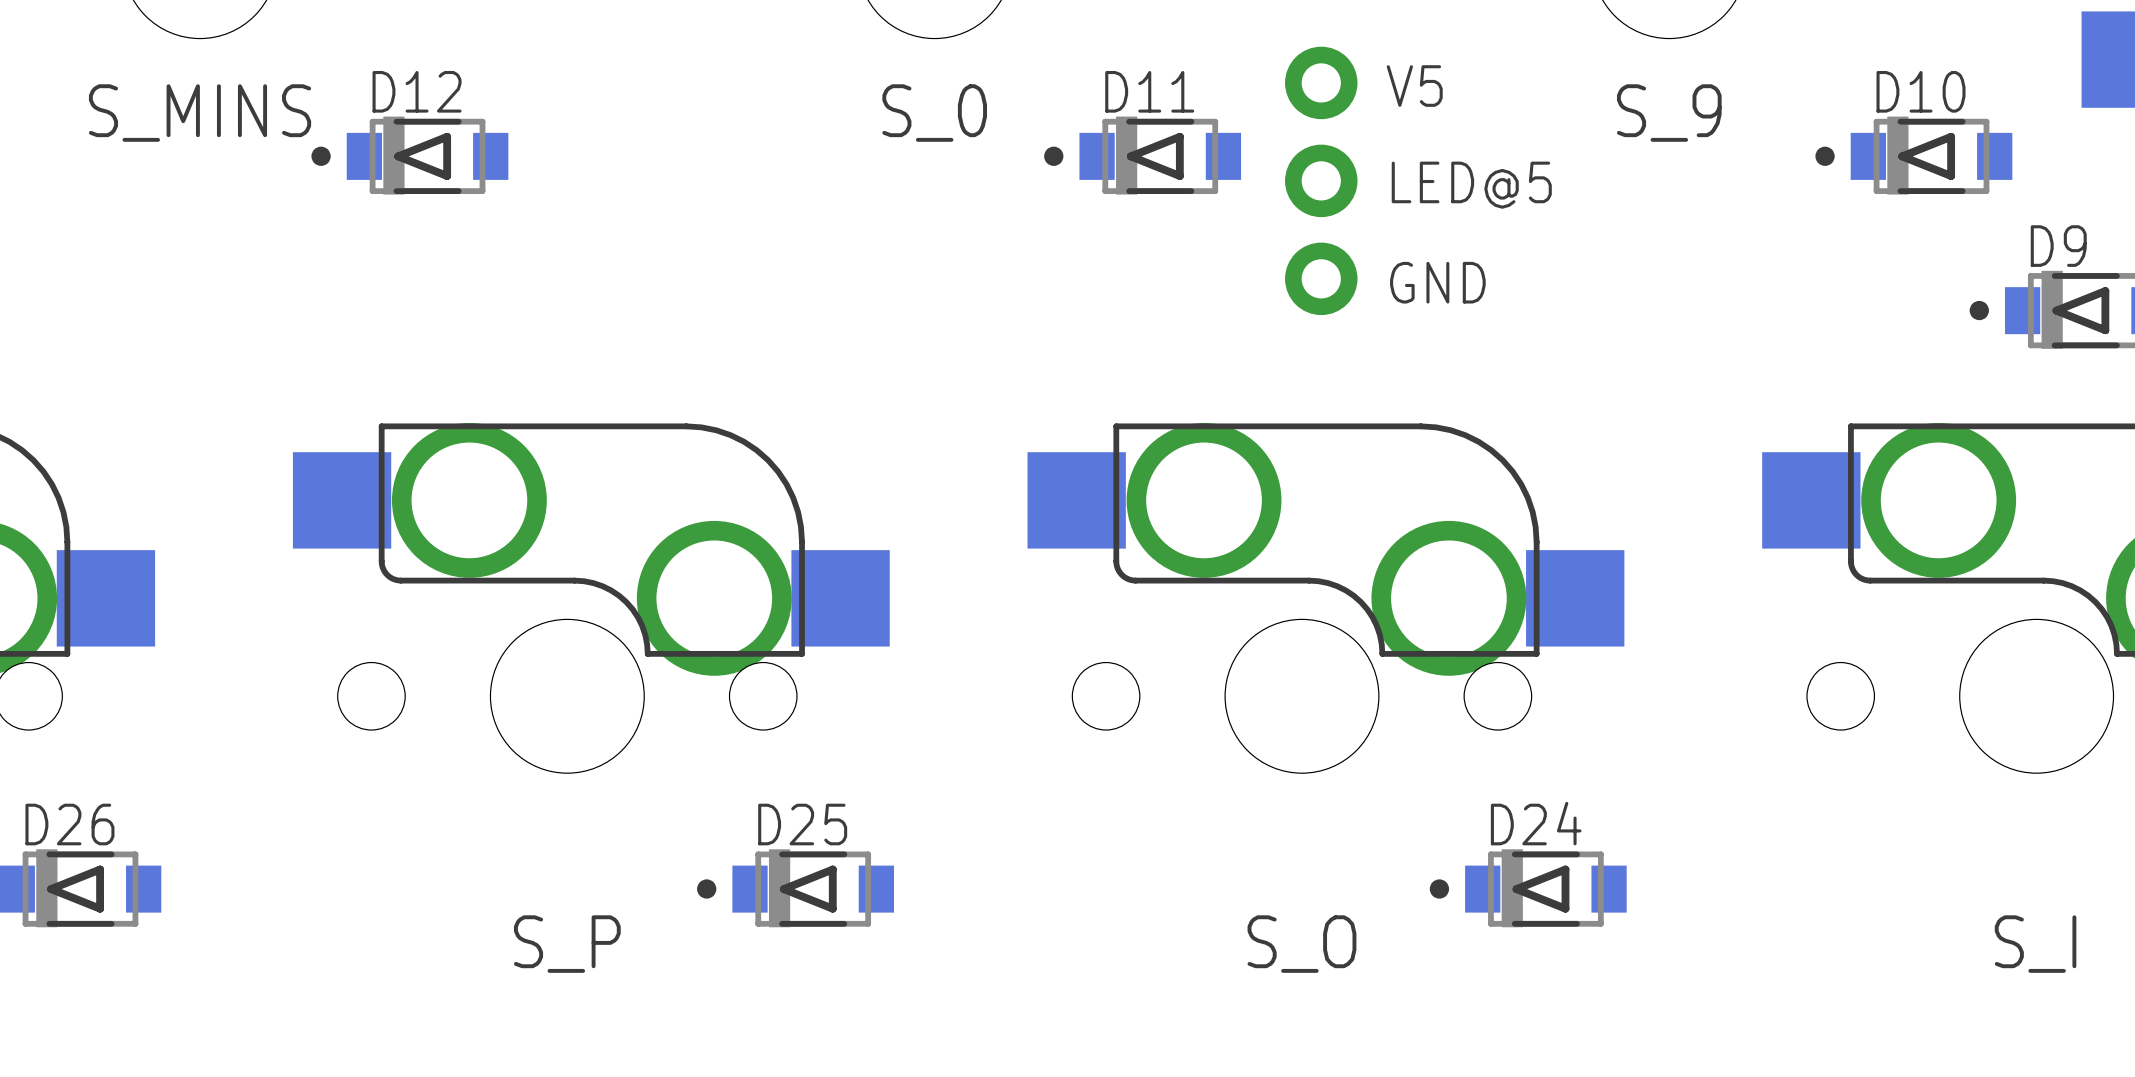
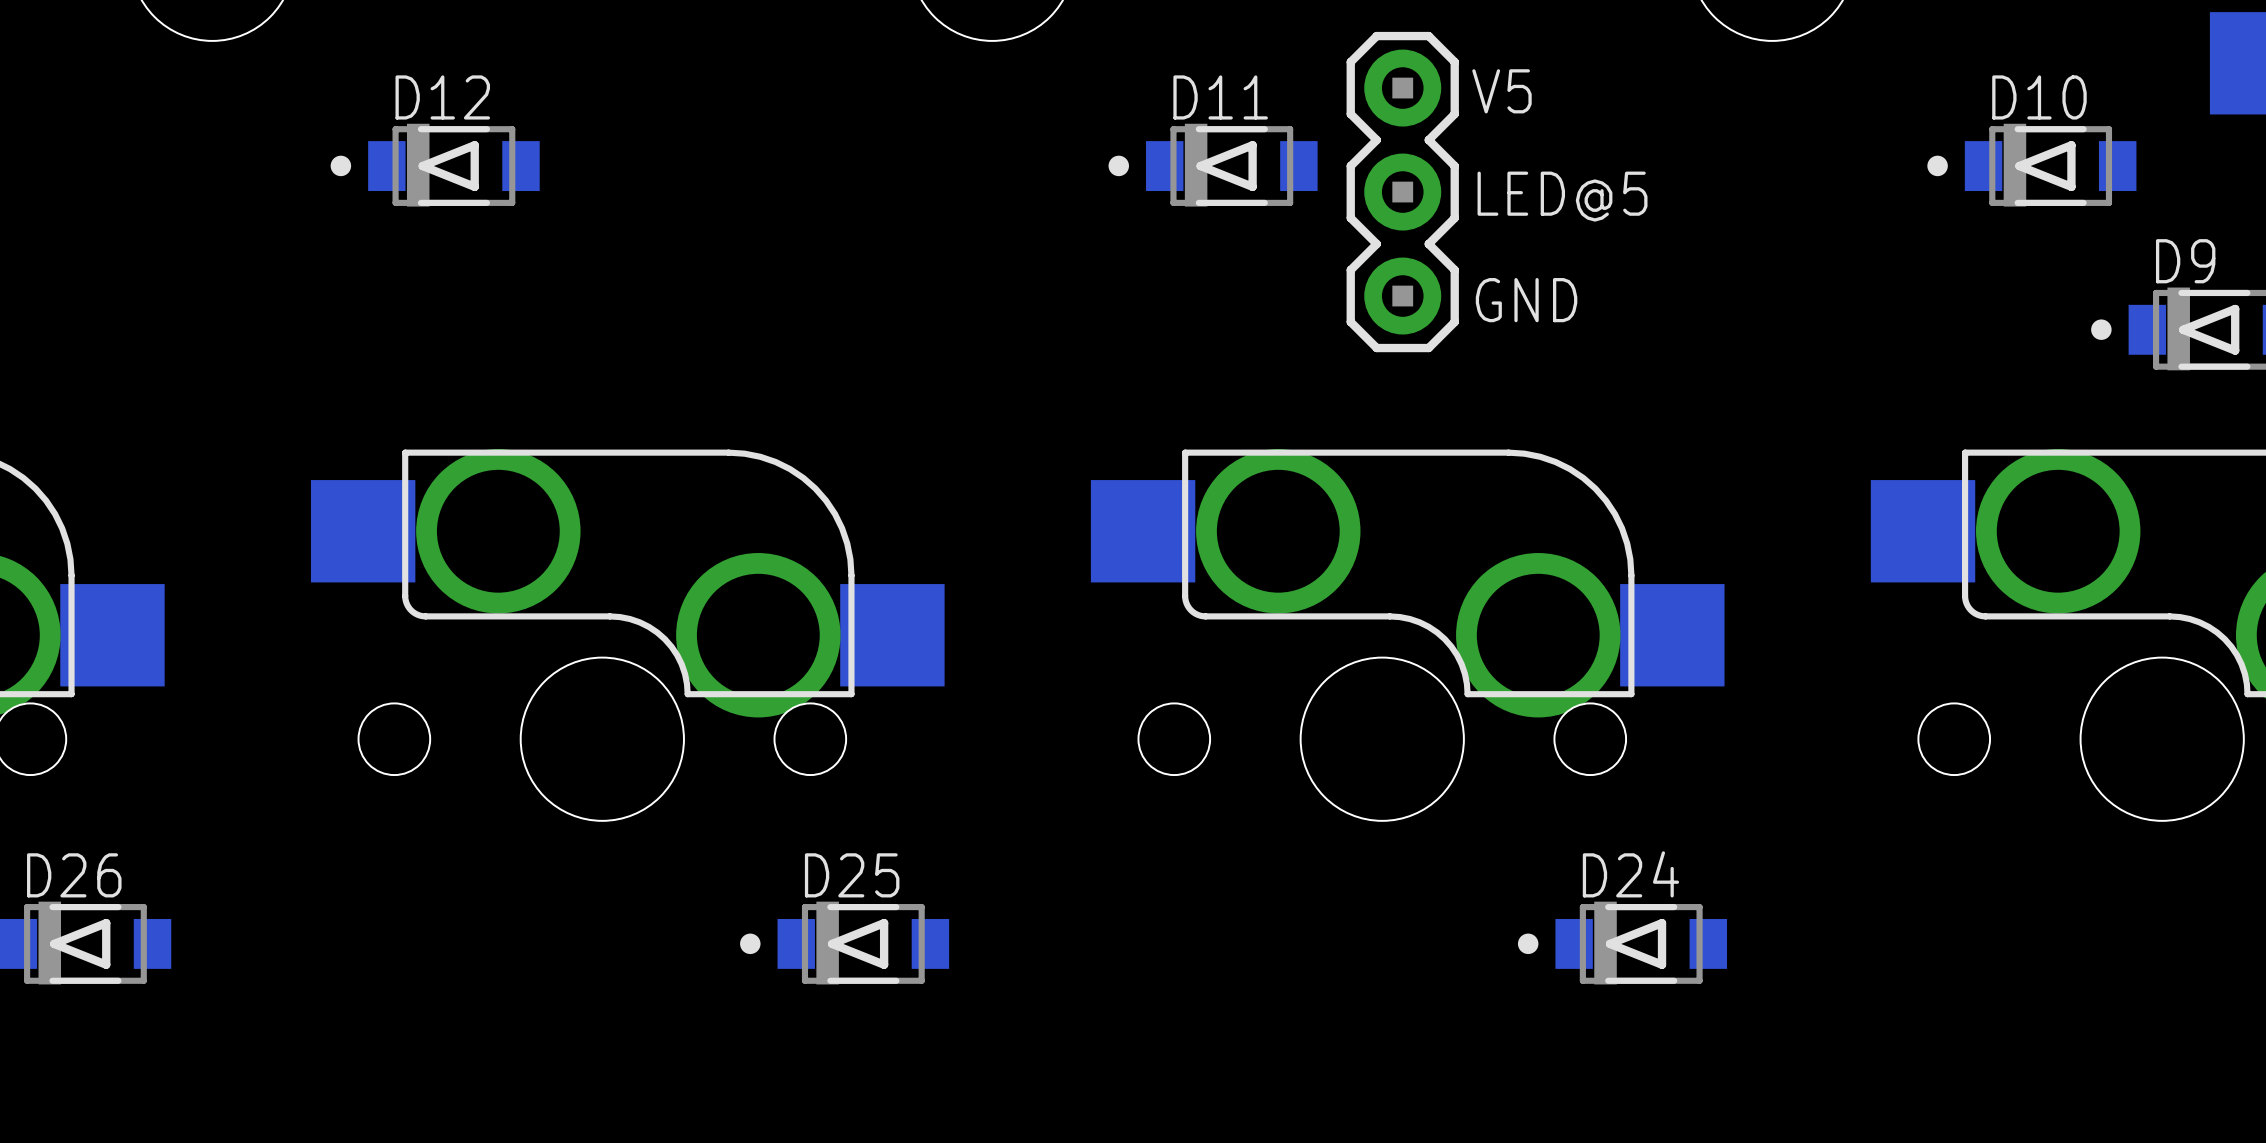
S_MINS name: S_MINS (200, 113) -> none
S_0 name: S_0 (934, 113) -> none
S_9 name: S_9 (1669, 113) -> none
part side: top (1321, 180) -> bottom (1402, 192)
S_P name: S_P (567, 944) -> none
S_O name: S_O (1301, 944) -> none
S_I name: S_I (2035, 944) -> none

